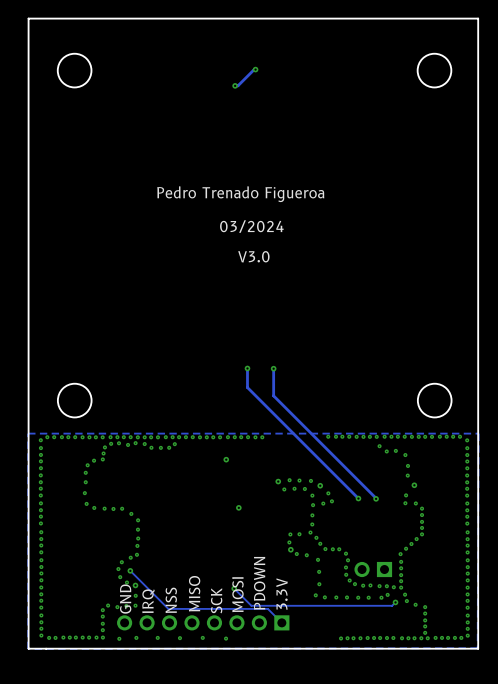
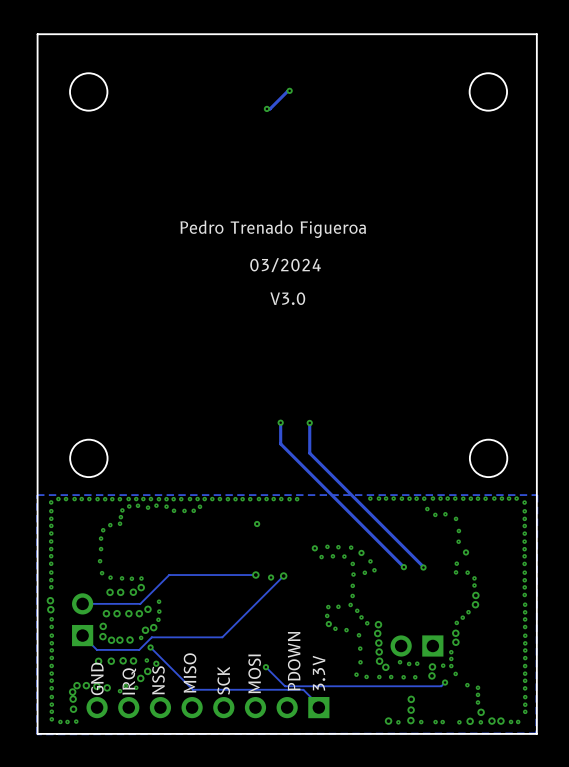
track: none -> (255, 575) (169, 575) (140, 603) (82, 603)
via: none -> (255, 575)
track: none -> (283, 576) (222, 637) (151, 637) (139, 649) (96, 649) (82, 635)
via: none -> (283, 576)
via: (131, 513) -> none
via: none -> (141, 587)
via: (138, 520) -> none
via: none -> (110, 592)
via: none -> (120, 592)
via: none -> (133, 592)
via: (422, 521) -> none
via: (40, 523) -> none
via: none -> (475, 595)
via: (422, 527) -> none
via: none -> (50, 600)
via: (41, 532) -> none
via: none -> (475, 604)
via: (422, 534) -> none
via: none -> (50, 609)
via: none -> (147, 609)
via: (41, 539) -> none
via: none -> (106, 613)
via: none -> (117, 613)
via: none -> (128, 613)
via: none -> (139, 613)
part: none -> (82, 619)
via: (332, 549) -> none
via: (339, 549) -> none
via: none -> (378, 624)
via: none -> (103, 626)
via: none -> (153, 627)
via: (345, 553) -> none
via: (136, 554) -> none
via: (400, 554) -> none
via: none -> (145, 630)
via: (130, 557) -> none
via: none -> (377, 633)
via: none -> (455, 633)
via: (348, 560) -> none
via: none -> (102, 636)
part footprint: [354, 561, 393, 578] -> [390, 635, 444, 657]
via: (401, 561) -> none
via: none -> (111, 640)
via: none -> (119, 640)
via: none -> (130, 640)
via: none -> (378, 642)
via: none -> (455, 642)
via: (345, 567) -> none
via: (401, 568) -> none
via: (118, 569) -> none
via: none -> (379, 651)
via: (346, 574) -> none
via: (120, 577) -> none
via: (349, 580) -> none
via: none -> (123, 660)
via: none -> (133, 660)
via: none -> (98, 661)
via: none -> (111, 661)
via: none -> (379, 661)
via: (379, 586) -> none
via: (386, 586) -> none
via: none -> (385, 667)
via: none -> (432, 666)
via: none -> (147, 671)
text position: MISO (194, 593) -> MISO (190, 673)
text position: MOSI (237, 594) -> MOSI (254, 673)
via: (387, 594) -> none
via: (135, 595) -> none
via: none -> (431, 675)
via: (381, 597) -> none
via: none -> (140, 678)
text position: GND (125, 599) -> GND (97, 678)
text position: NSS (171, 600) -> NSS (158, 680)
text position: SCK (216, 600) -> SCK (223, 680)
text position: IRQ (148, 601) -> IRQ (129, 681)
via: (406, 601) -> none
via: none -> (77, 685)
via: none -> (86, 685)
via: none -> (96, 686)
via: (135, 605) -> none
via: (126, 606) -> none
via: none -> (107, 687)
via: none -> (72, 692)
via: (102, 616) -> none
via: none -> (73, 699)
via: none -> (411, 699)
part: (203, 622) -> none
via: (102, 623) -> none
part: none -> (207, 707)
via: none -> (73, 709)
via: (425, 626) -> none
via: none -> (411, 710)
via: none -> (481, 712)
via: (102, 630) -> none
via: (425, 632) -> none
via: (467, 635) -> none
via: none -> (410, 720)
via: (69, 637) -> none
via: (75, 637) -> none
via: (82, 637) -> none
via: (89, 637) -> none
via: (96, 637) -> none
via: (102, 637) -> none
via: (136, 637) -> none
via: (157, 637) -> none
via: (202, 637) -> none
via: none -> (388, 721)
via: none -> (470, 721)
via: (435, 637) -> none
via: none -> (491, 721)
via: (442, 637) -> none
via: none -> (500, 721)
via: (448, 637) -> none
via: (119, 638) -> none
via: (179, 638) -> none
via: (226, 638) -> none
via: (341, 638) -> none
via: (347, 638) -> none
via: (360, 638) -> none
via: (367, 638) -> none
via: (380, 638) -> none
via: (402, 638) -> none
via: (414, 638) -> none
via: (421, 638) -> none

